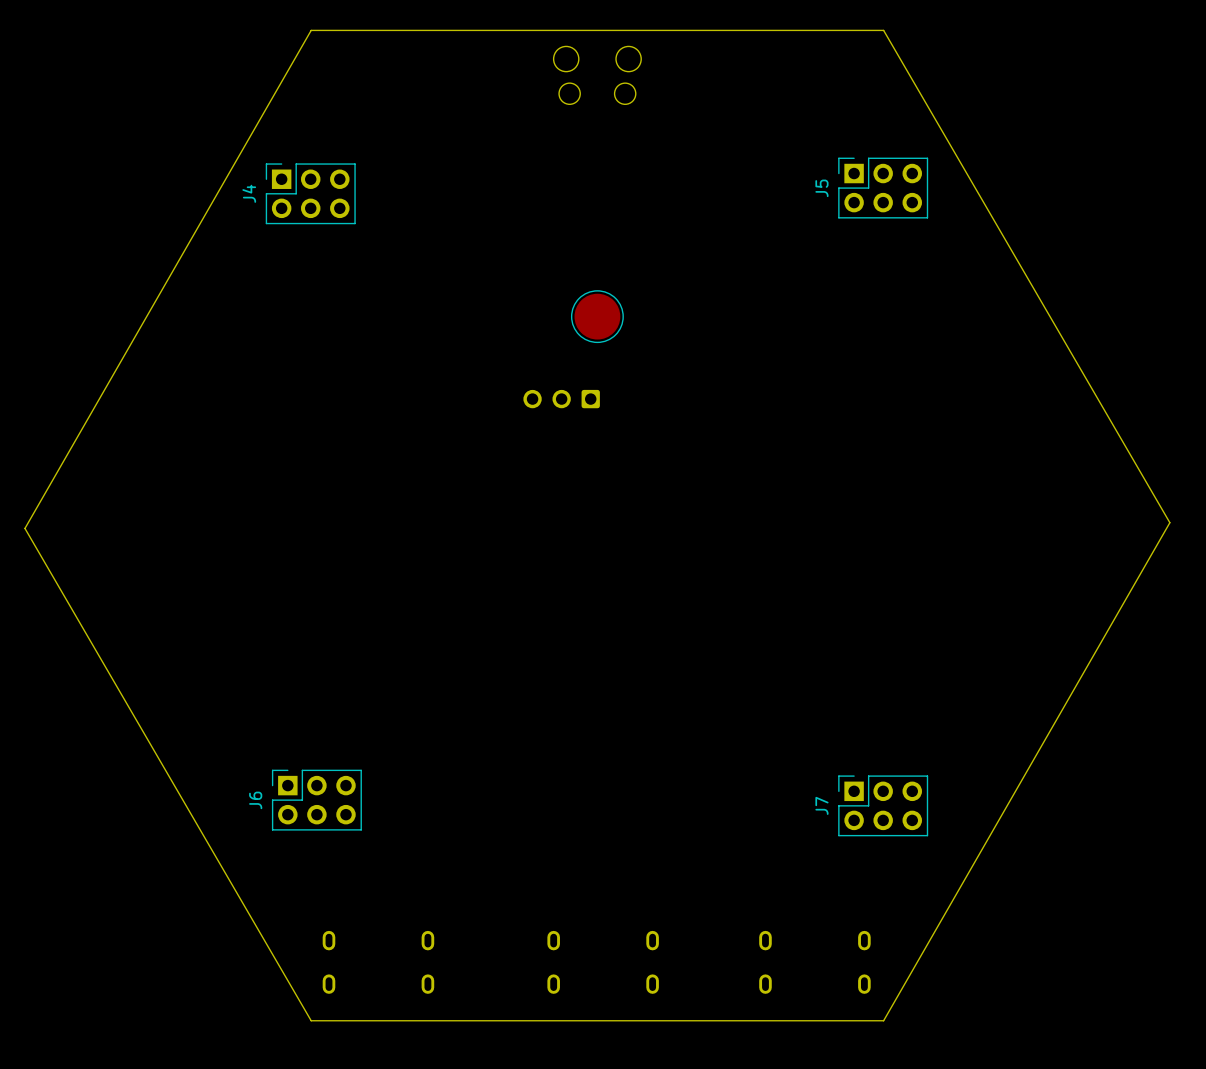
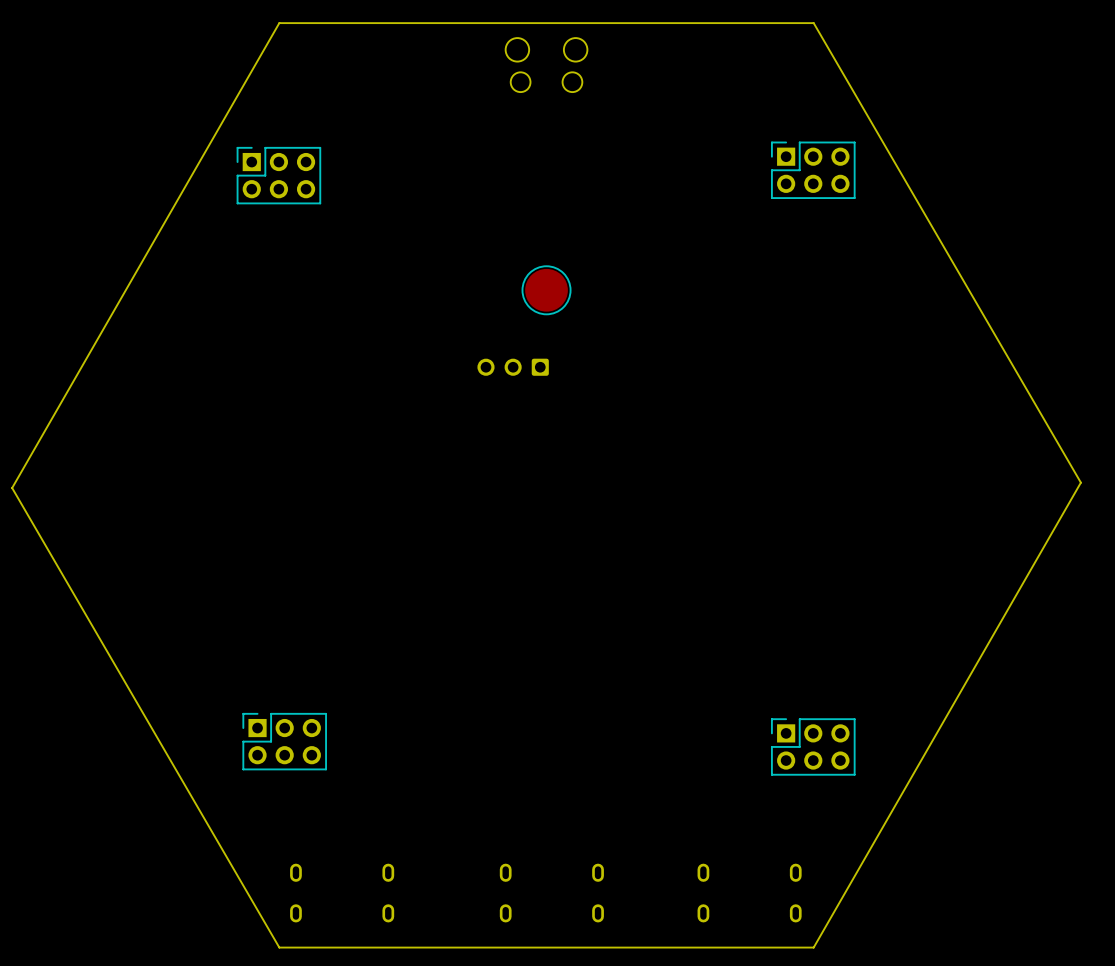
J5 name: J5 (821, 188) -> none
J4 name: J4 (249, 193) -> none
J6 name: J6 (255, 800) -> none
J7 name: J7 (821, 805) -> none

